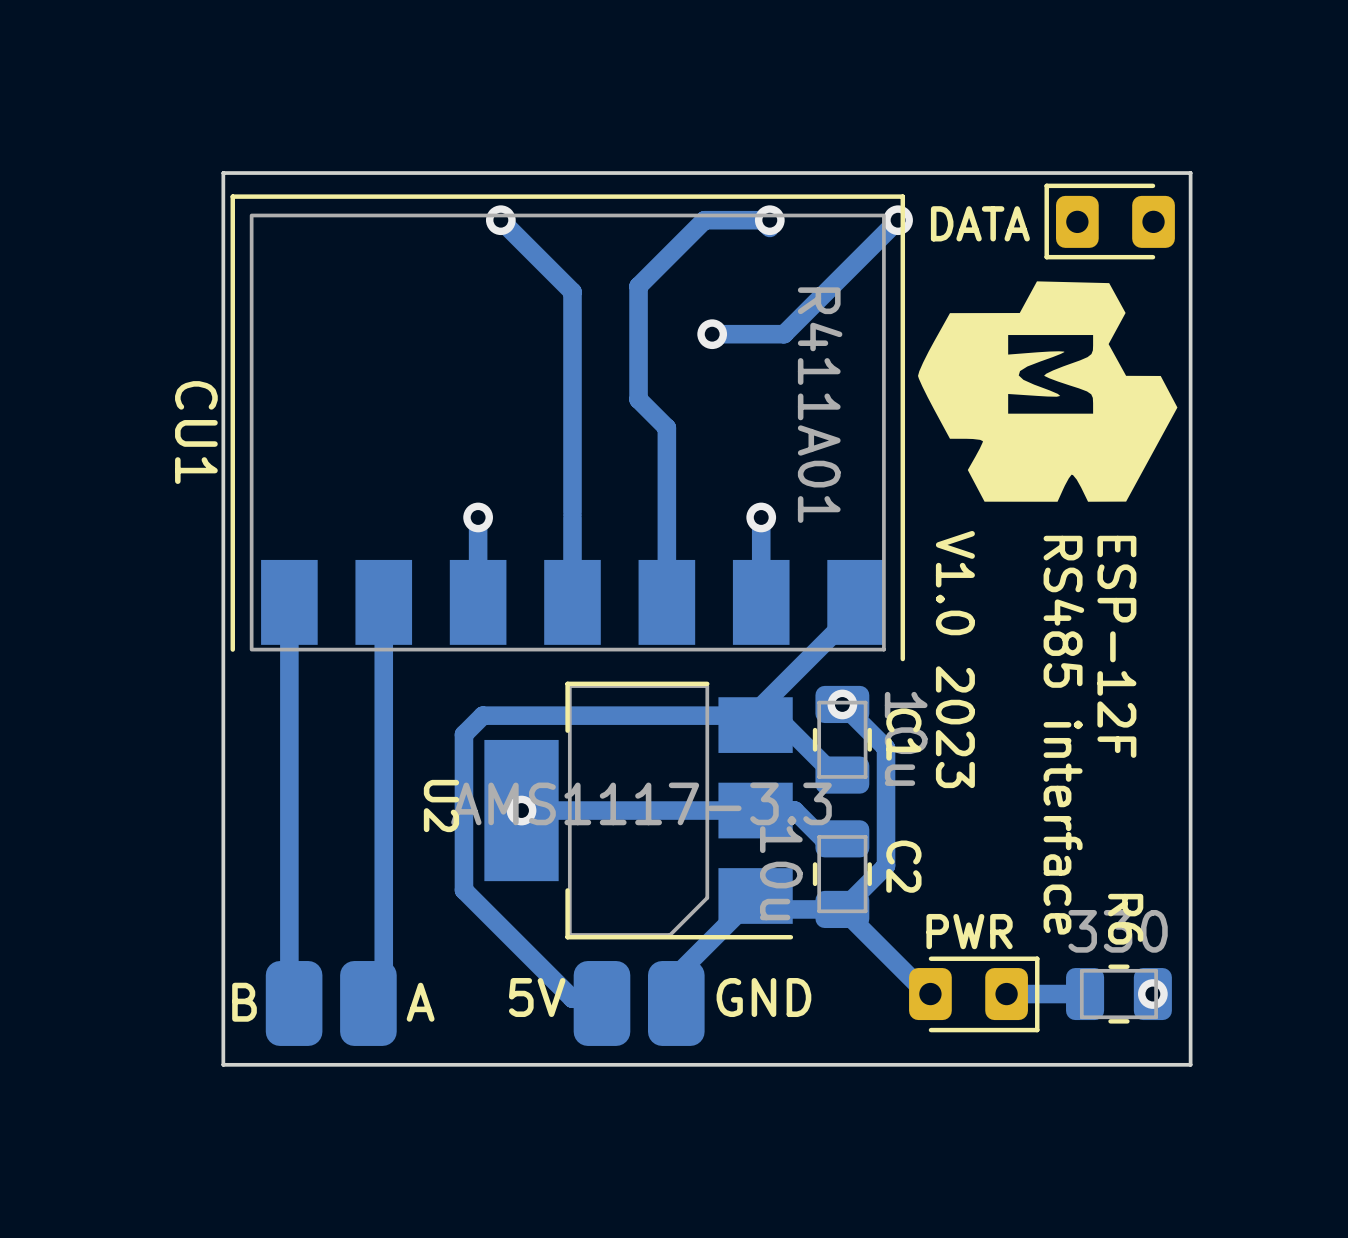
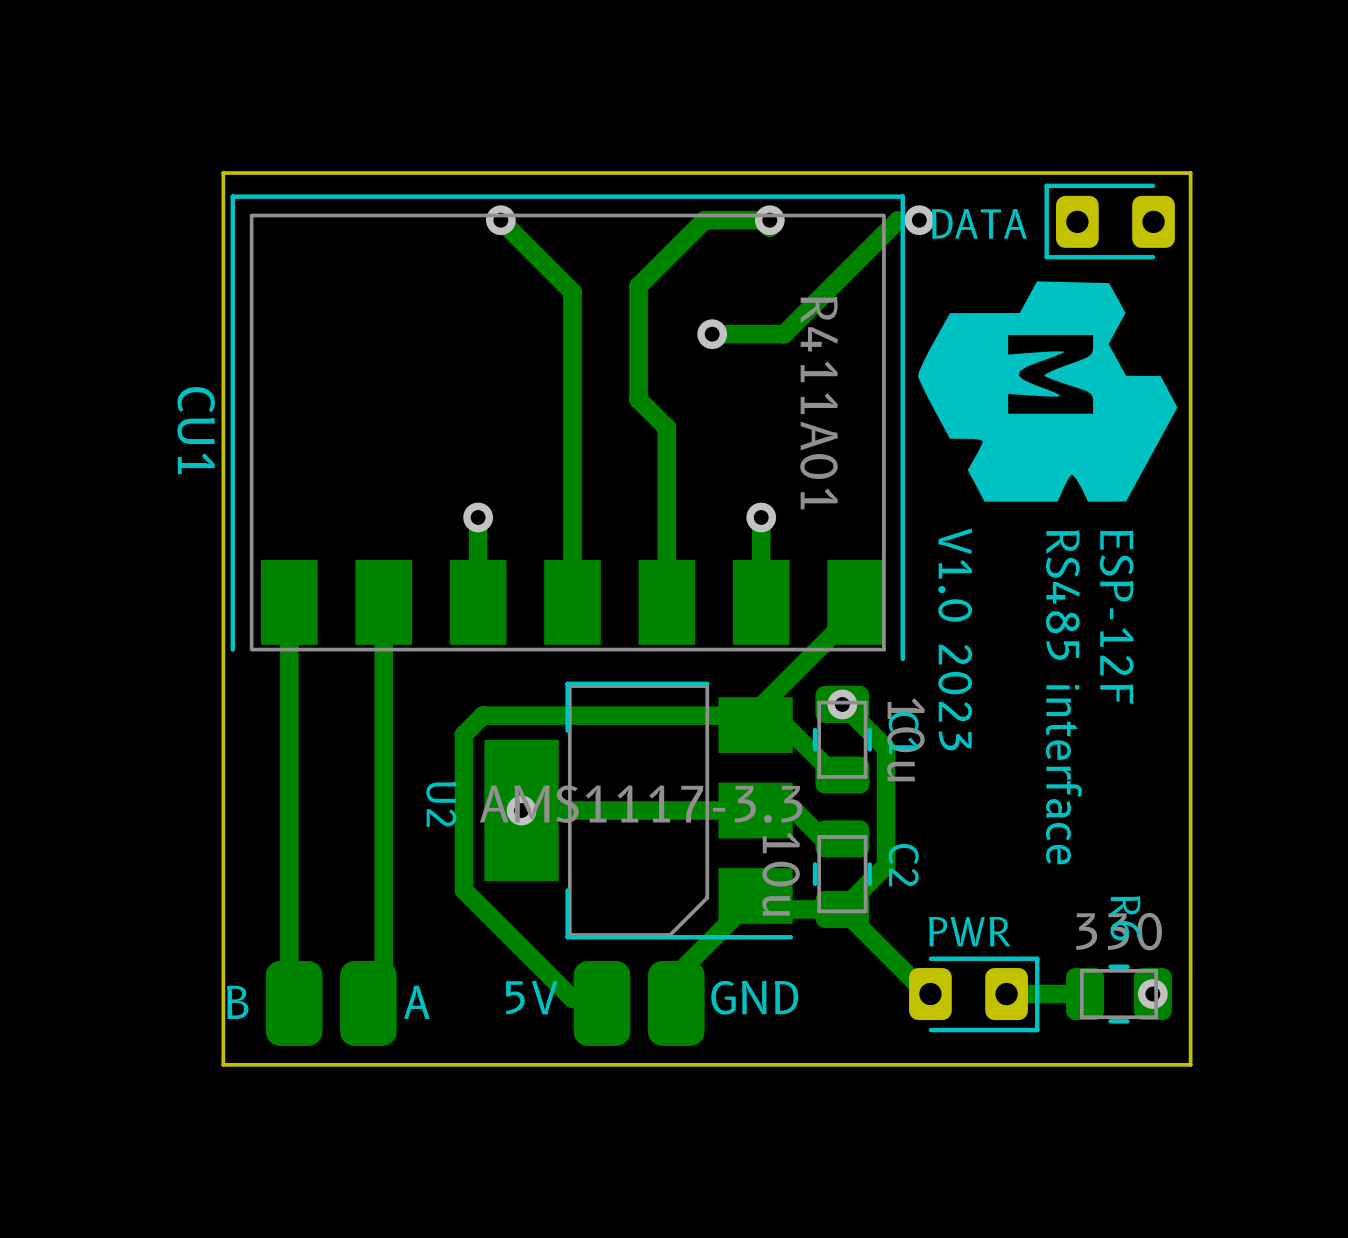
via position: (898, 220) -> (919, 220)

